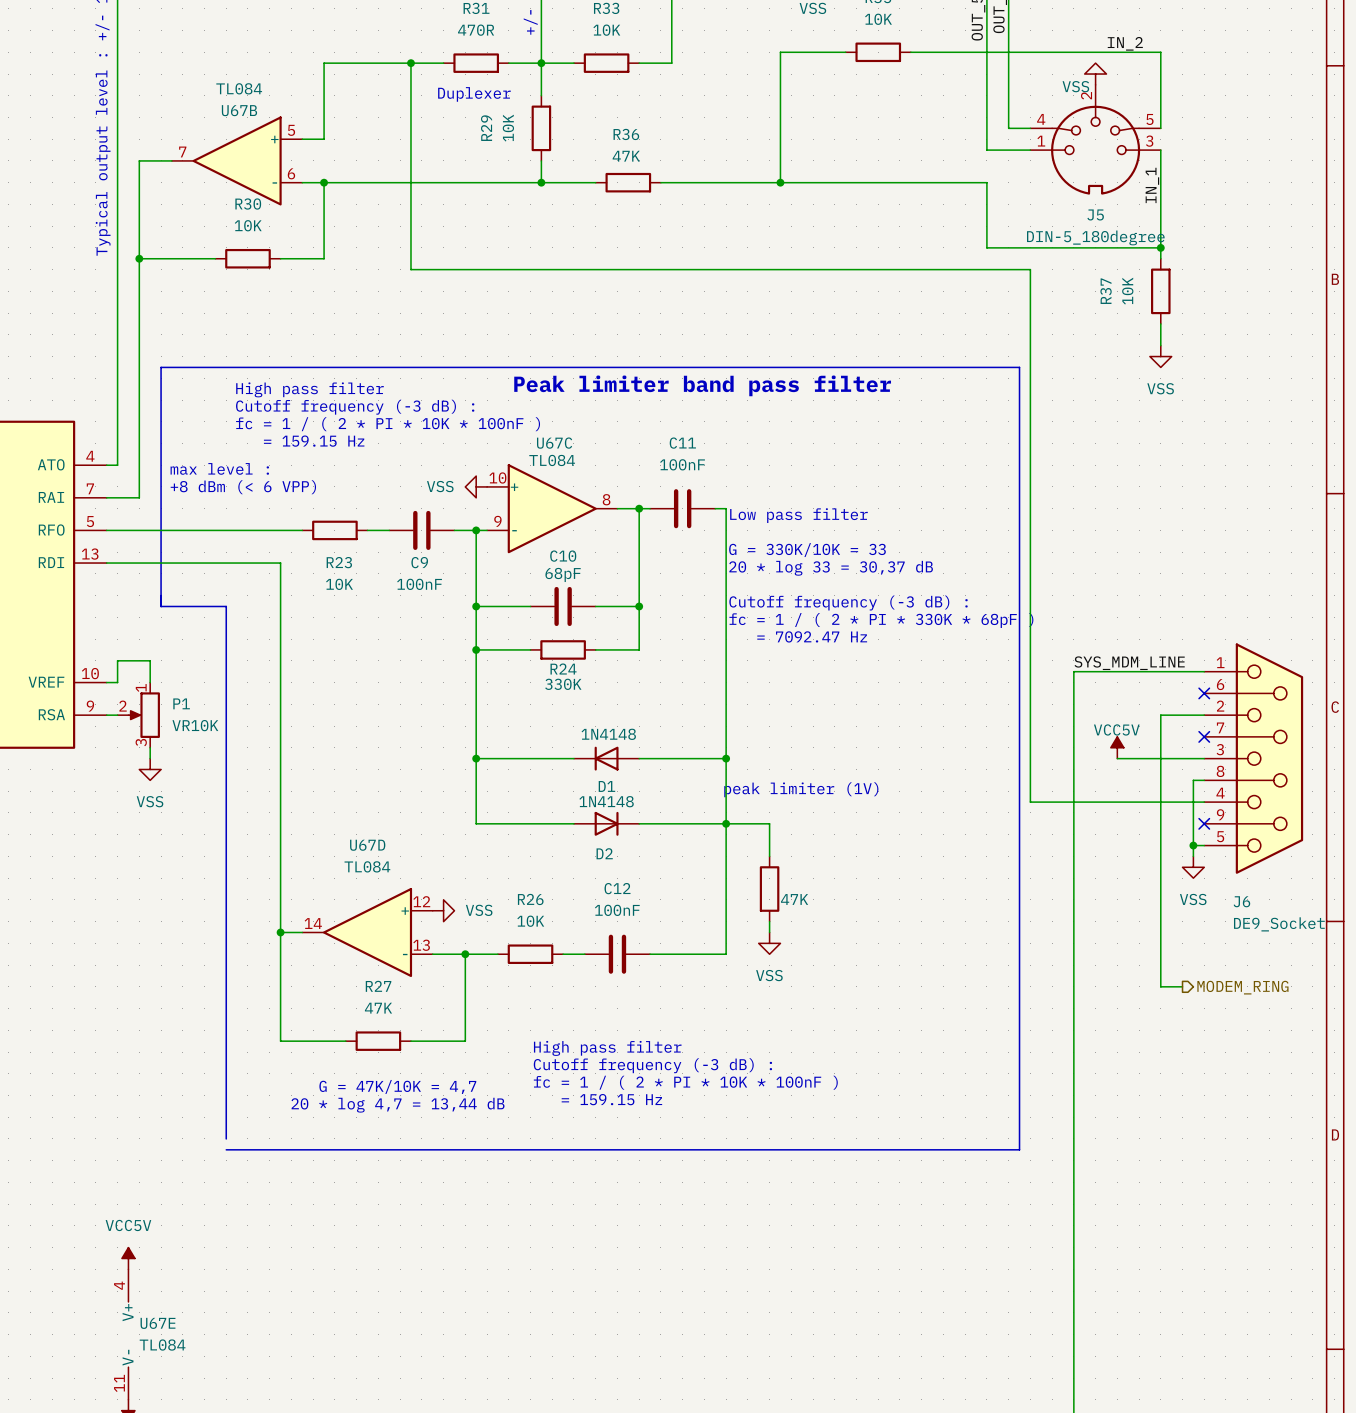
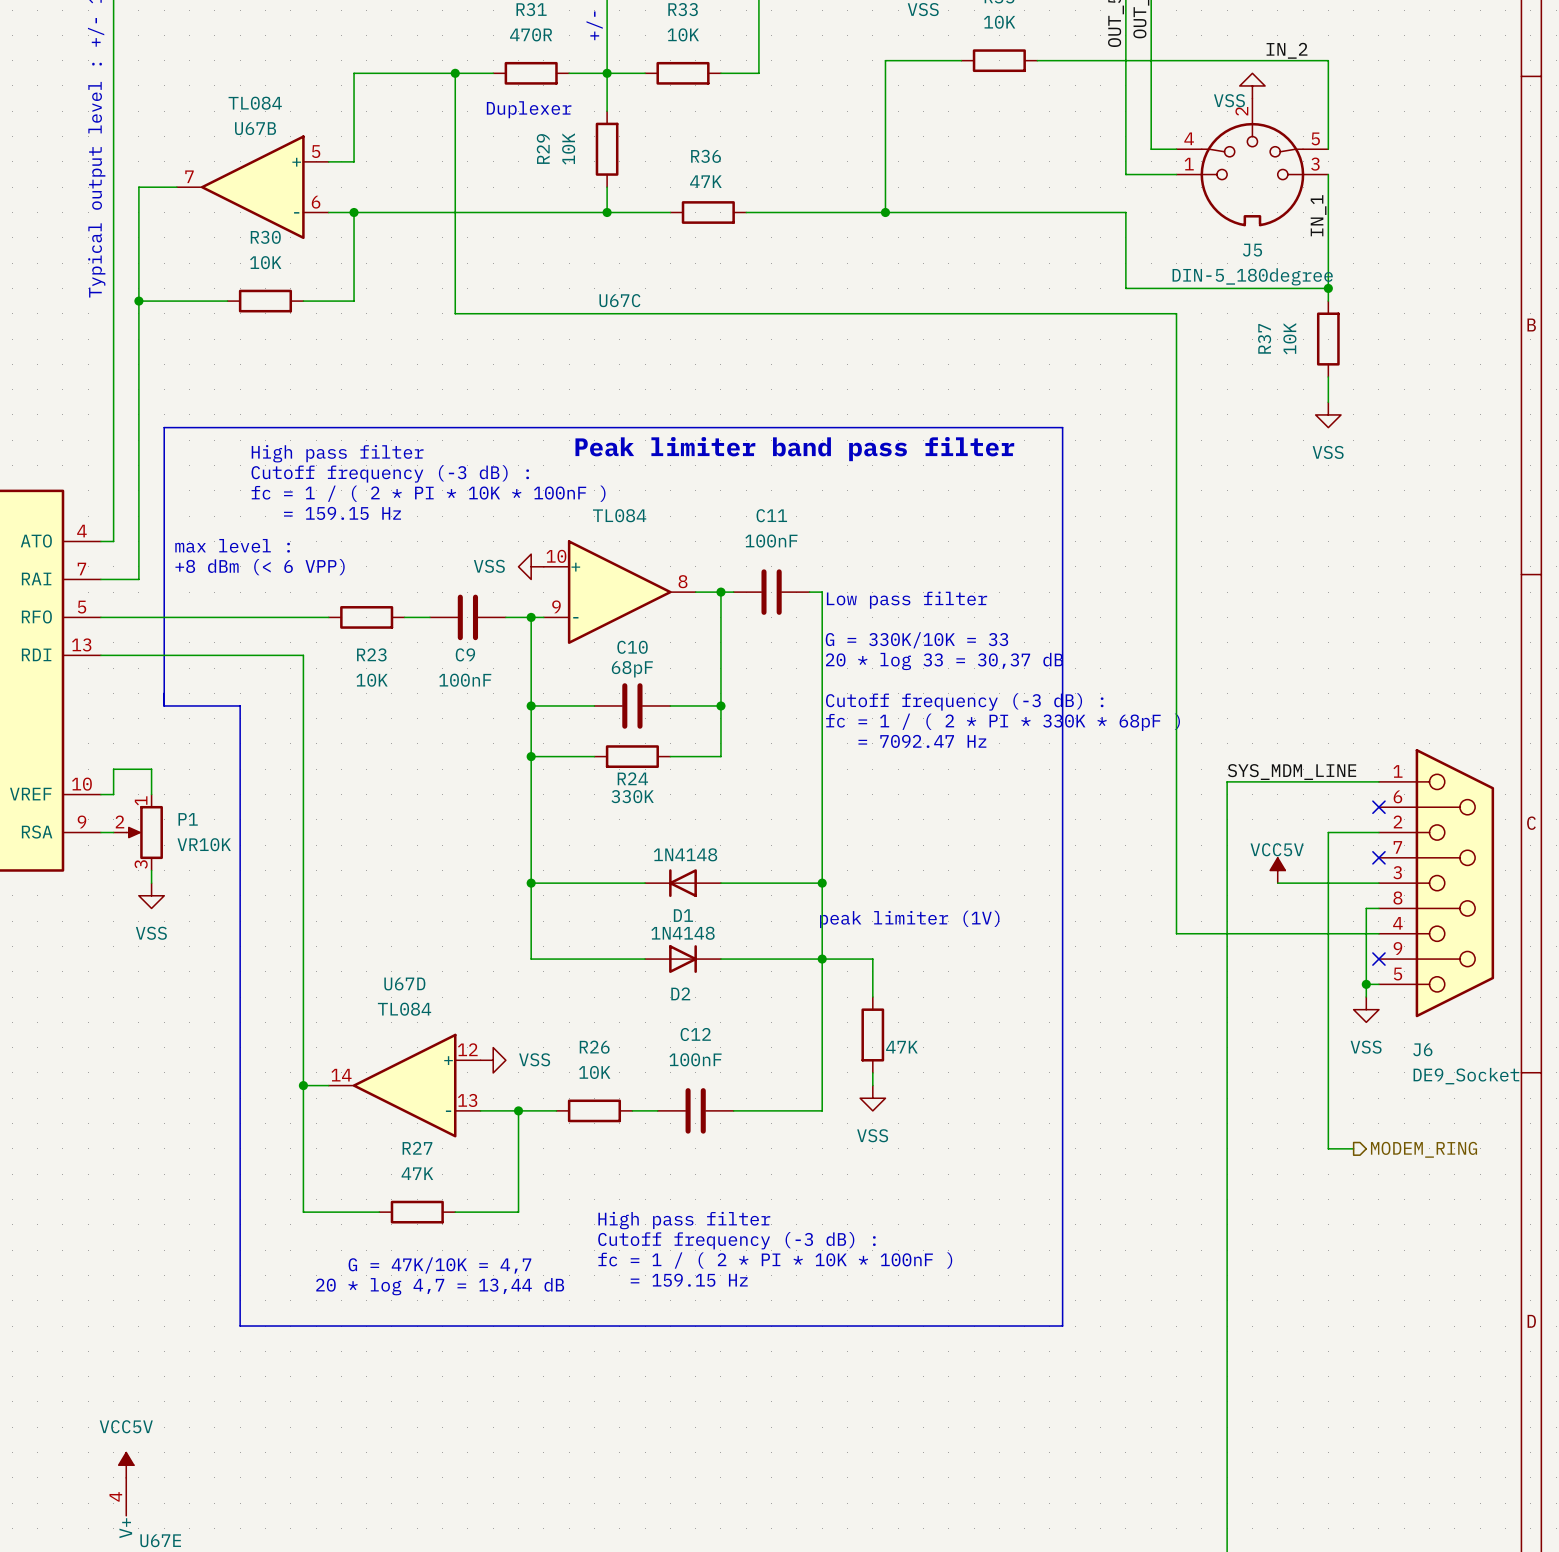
line: (932, 367) (1019, 367) (1019, 1149) (226, 1149) -> (1062, 427) (1062, 1326) (240, 1326)
U67C name position: U67C (554, 443) -> U67C (619, 300)
U67C value position: TL084 (552, 460) -> TL084 (619, 515)

